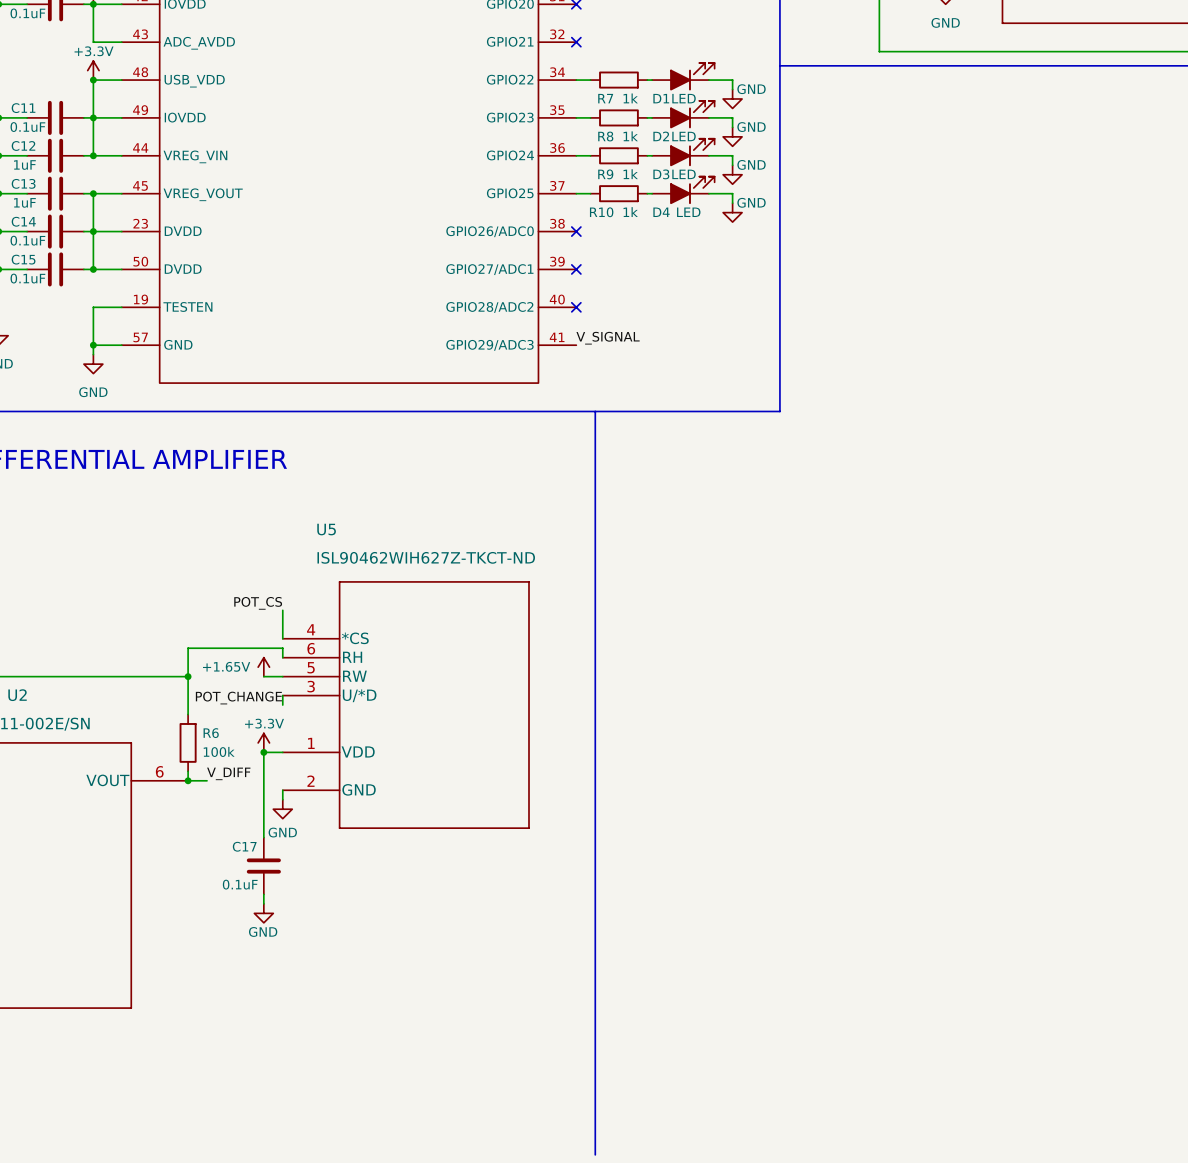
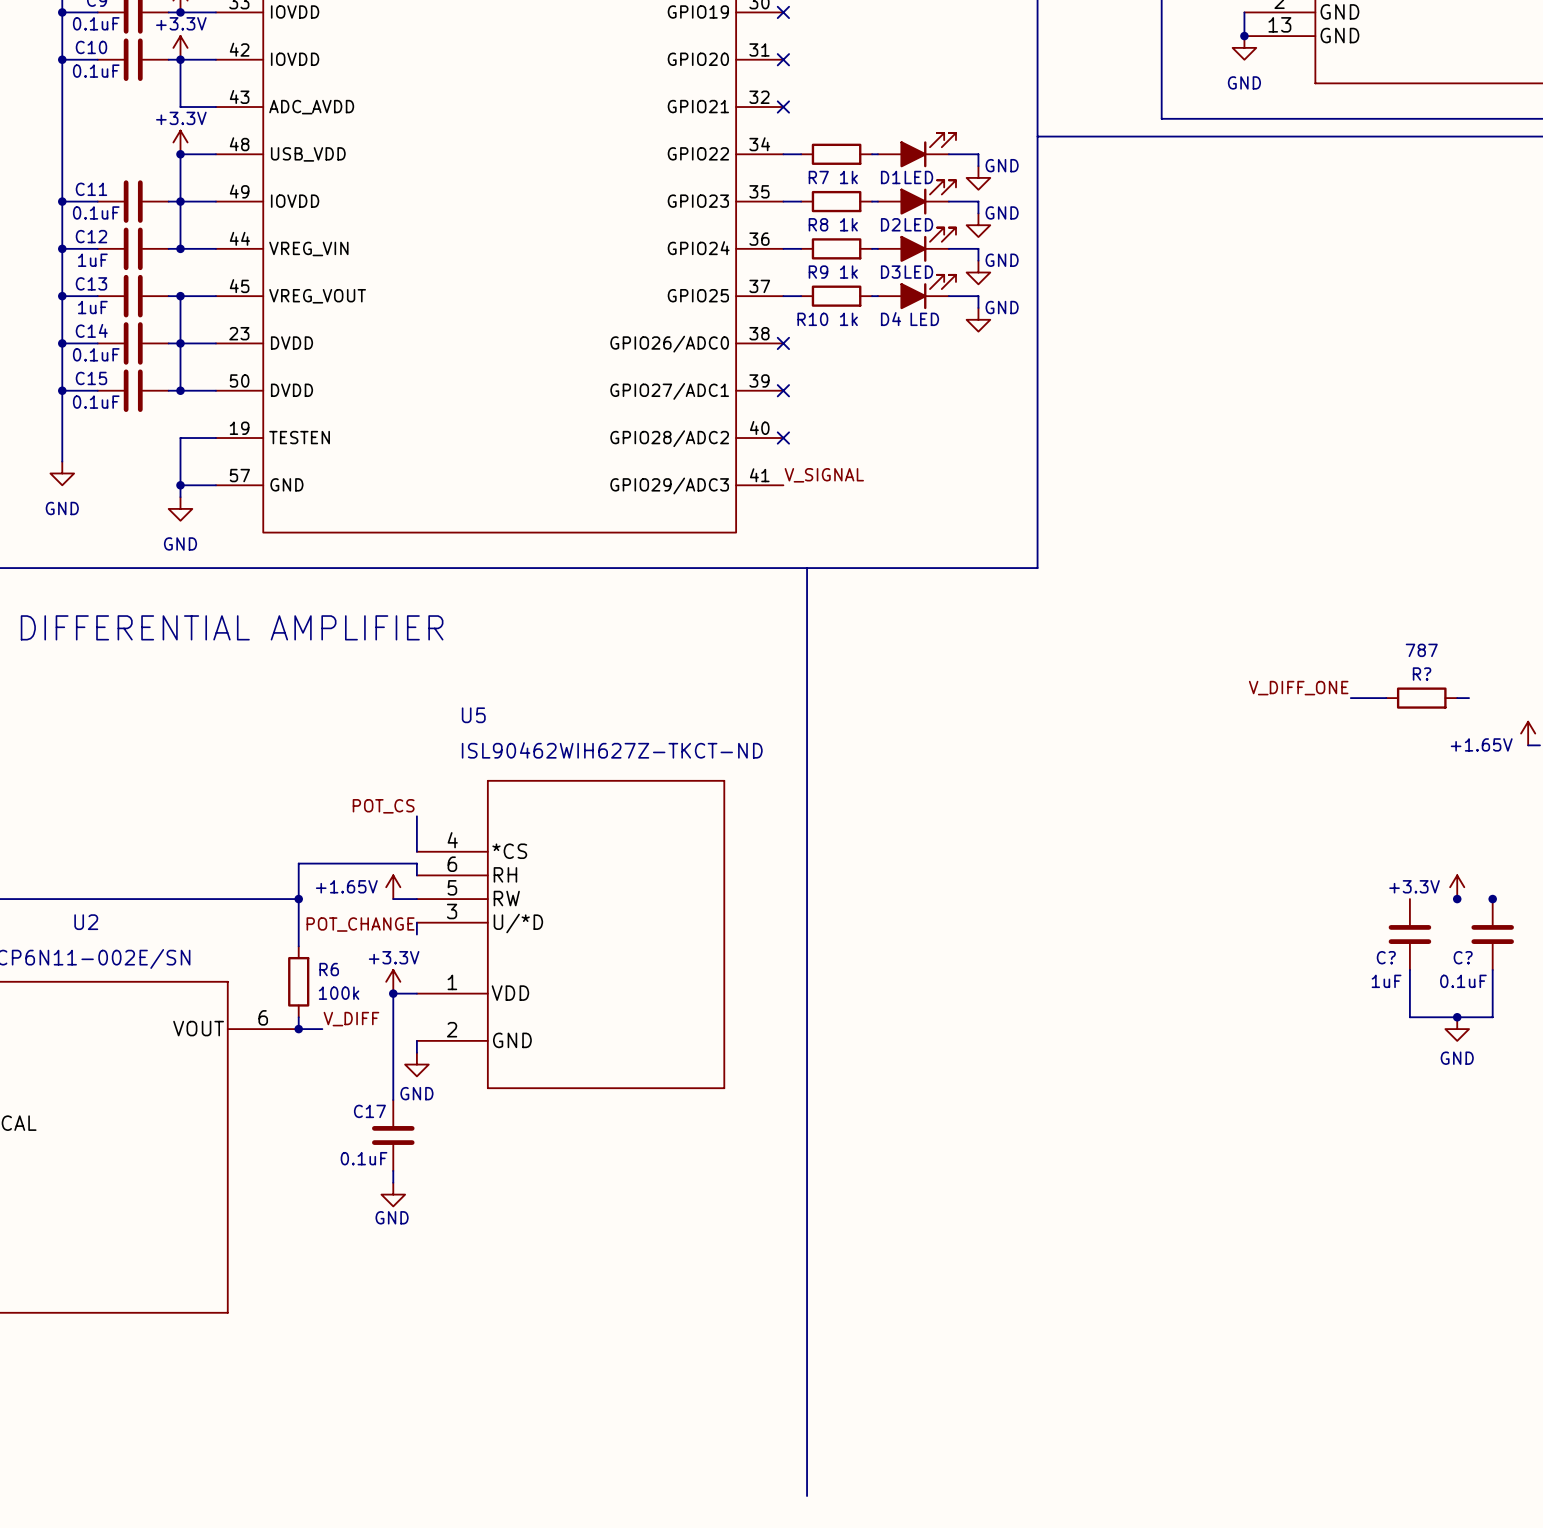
label: none -> V_DIFF_ONE (1298, 688)
wire: none -> (1350, 698) (1386, 698)
R?: none -> 787 (1421, 698)
wire: none -> (1457, 698) (1469, 698)
power symbol: none -> +1.65V (1528, 733)
wire: none -> (1528, 745) (1539, 745)
power symbol: none -> +3.3V (1457, 887)
junction: none -> (1457, 899)
junction: none -> (1492, 899)
C?: none -> 1uF (1409, 934)
C?: none -> 0.1uF (1492, 934)
wire: none -> (1409, 969) (1409, 1017) (1492, 1017) (1492, 969)
junction: none -> (1457, 1017)
power symbol: none -> GND (1457, 1029)

